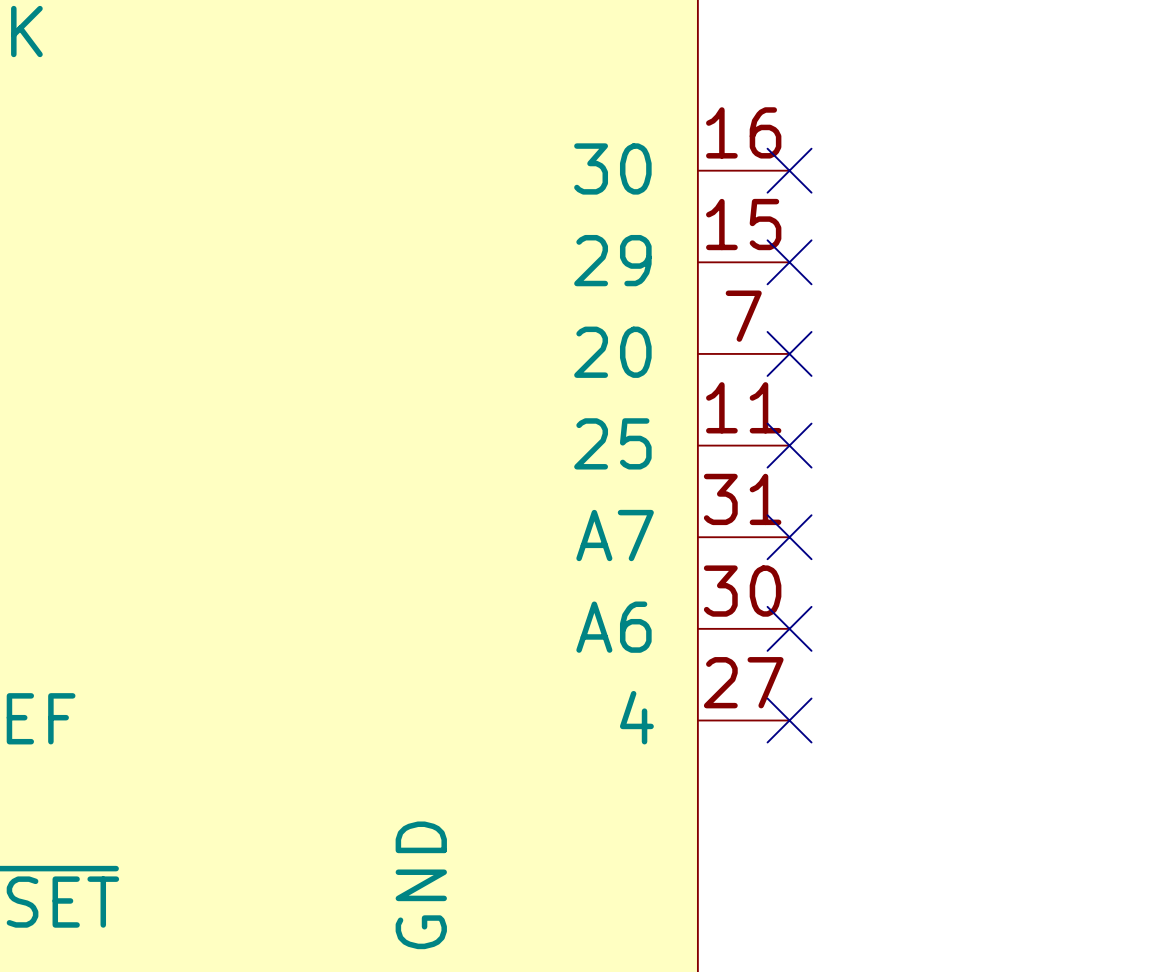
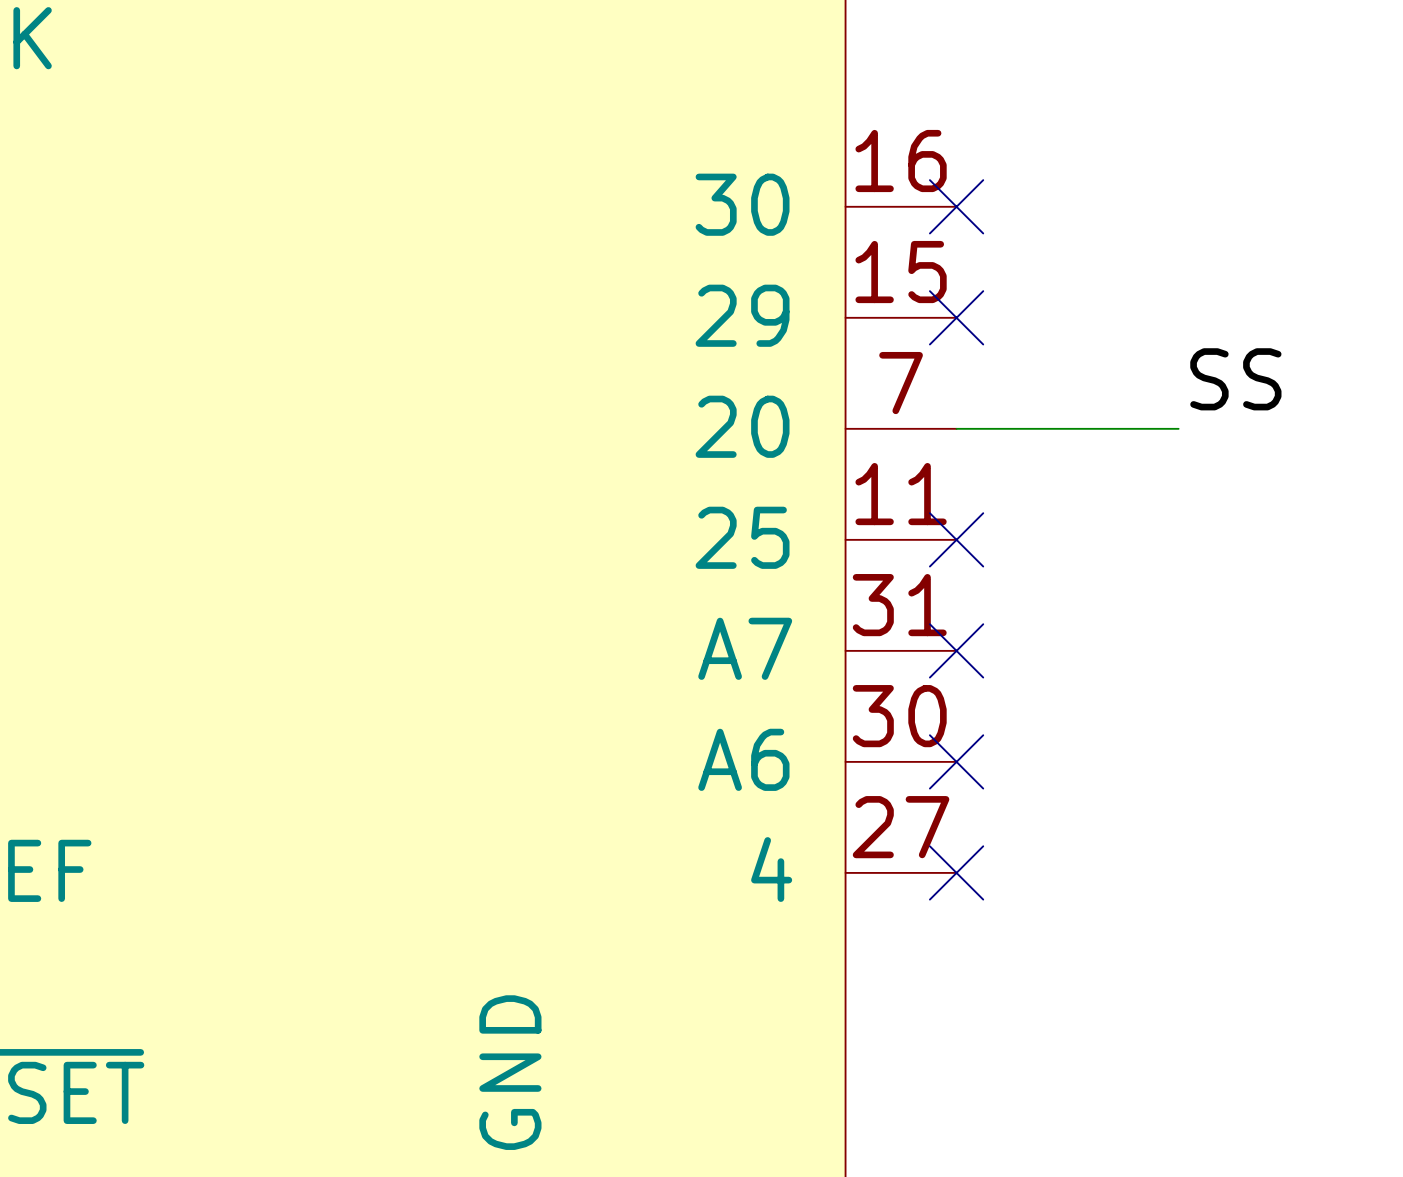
label: none -> SS (1235, 379)
wire: none -> (956, 428) (1178, 428)
no-connect mark: (789, 353) -> none

